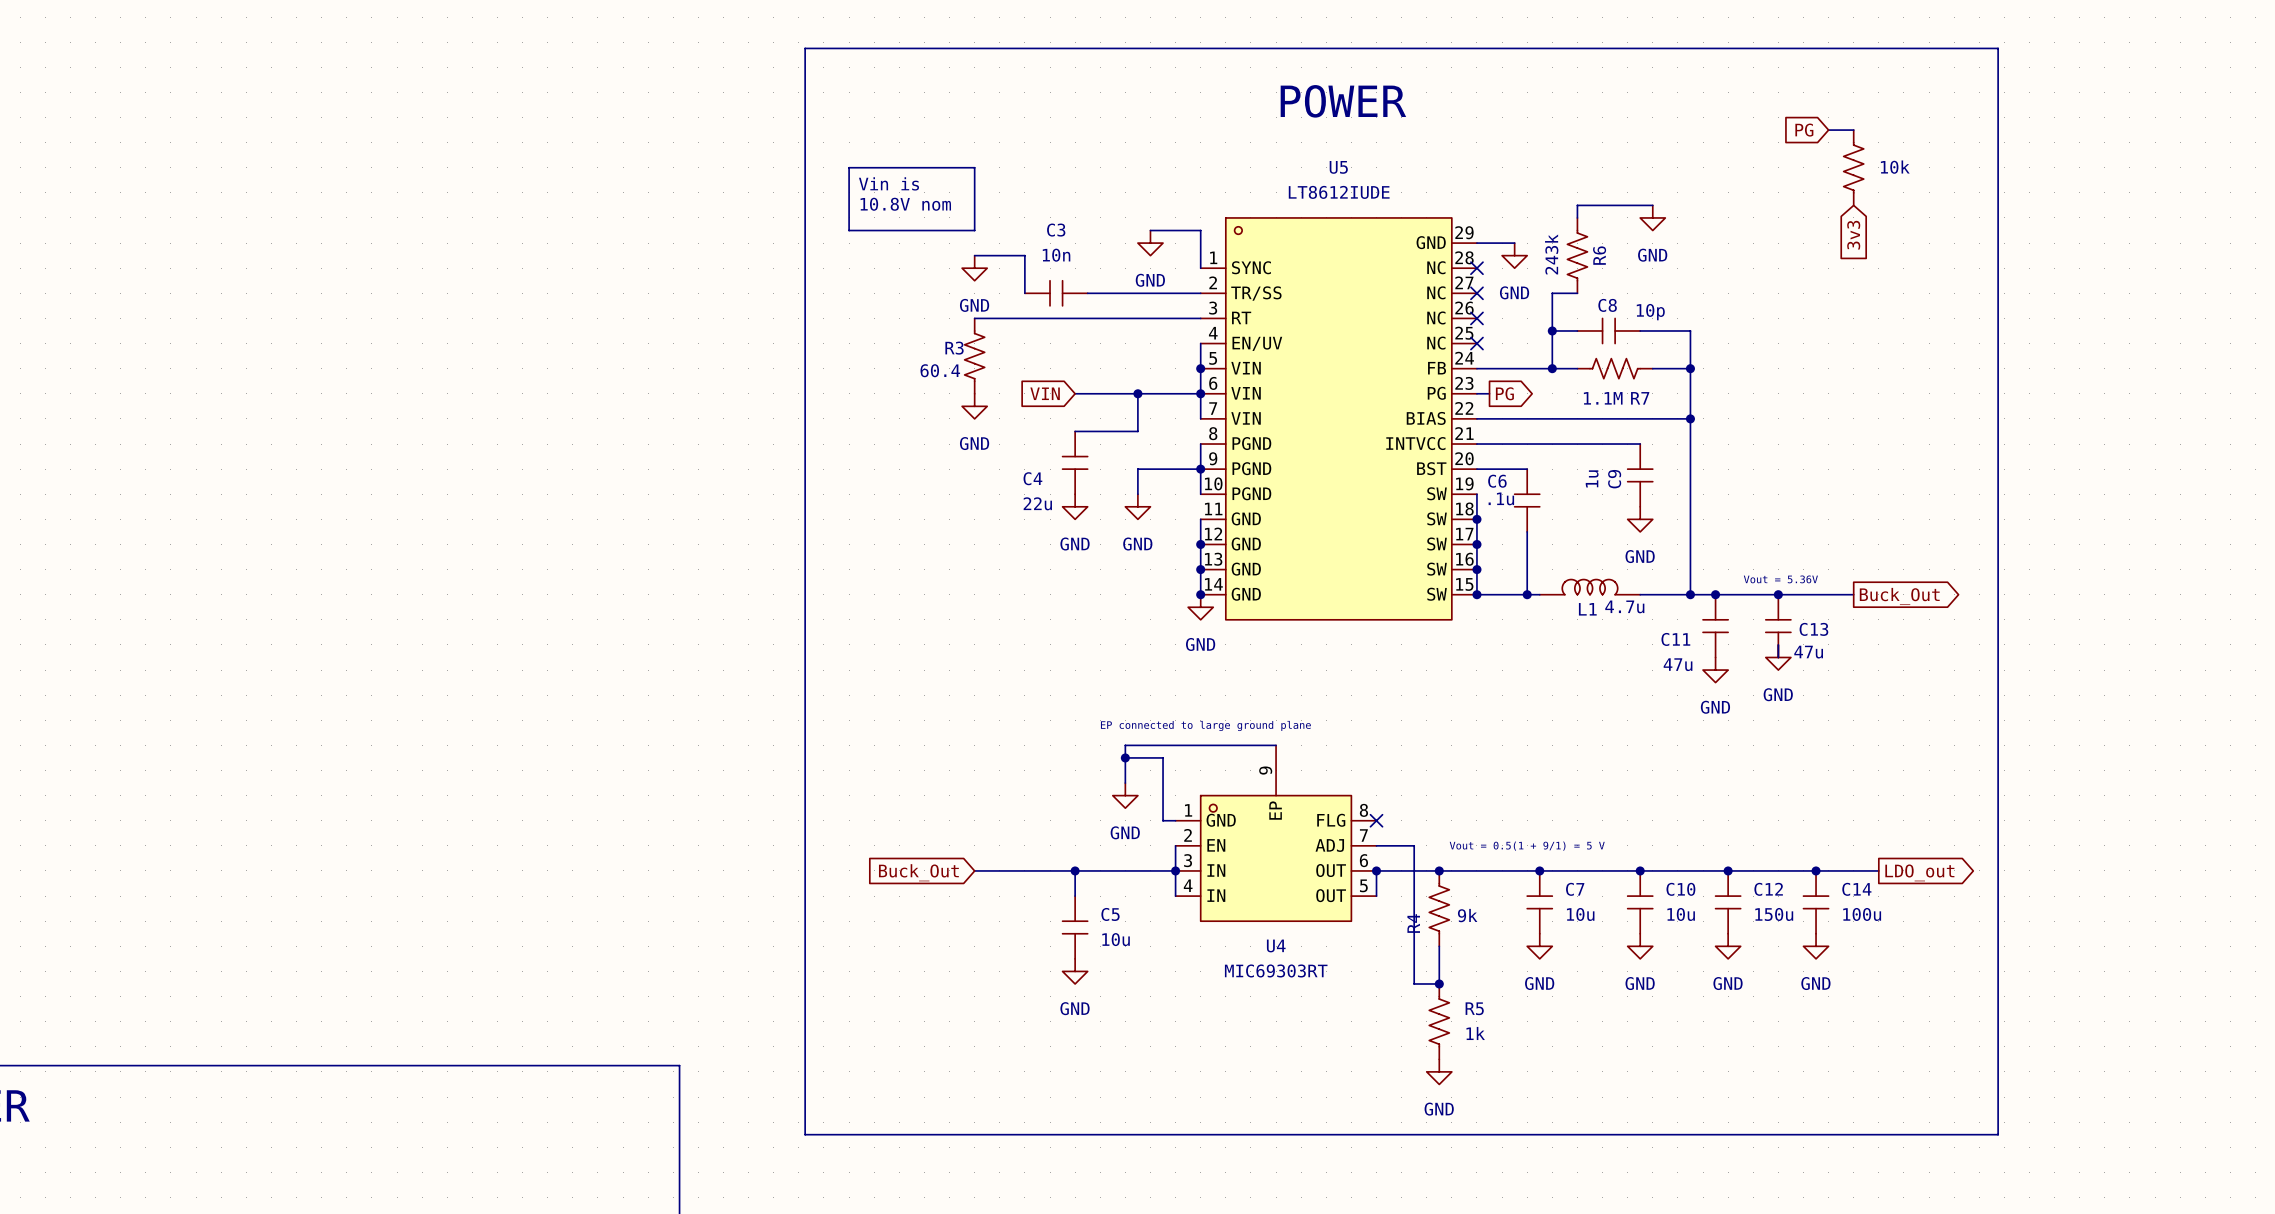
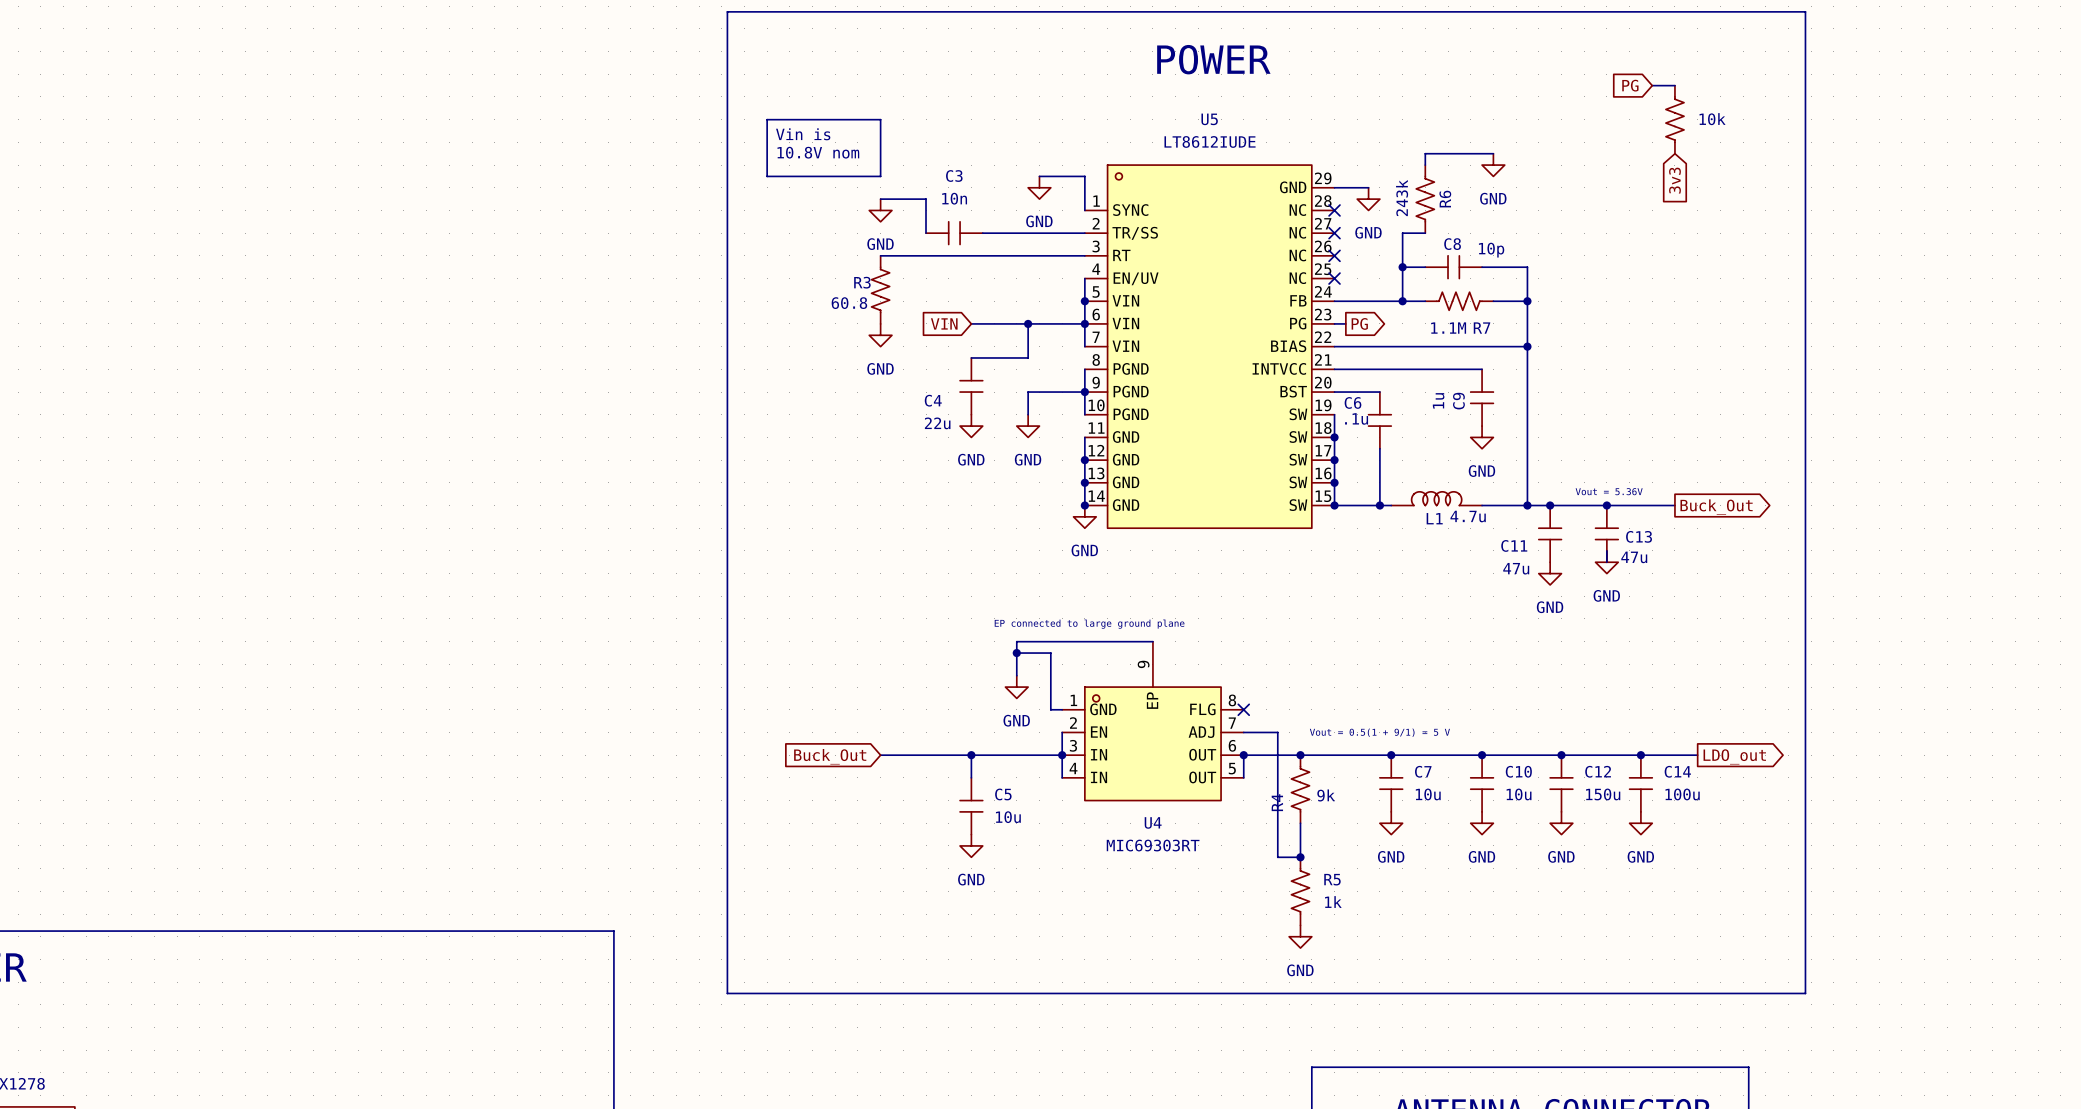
R3 value: 60.4 (940, 370) -> 60.8 (849, 303)

